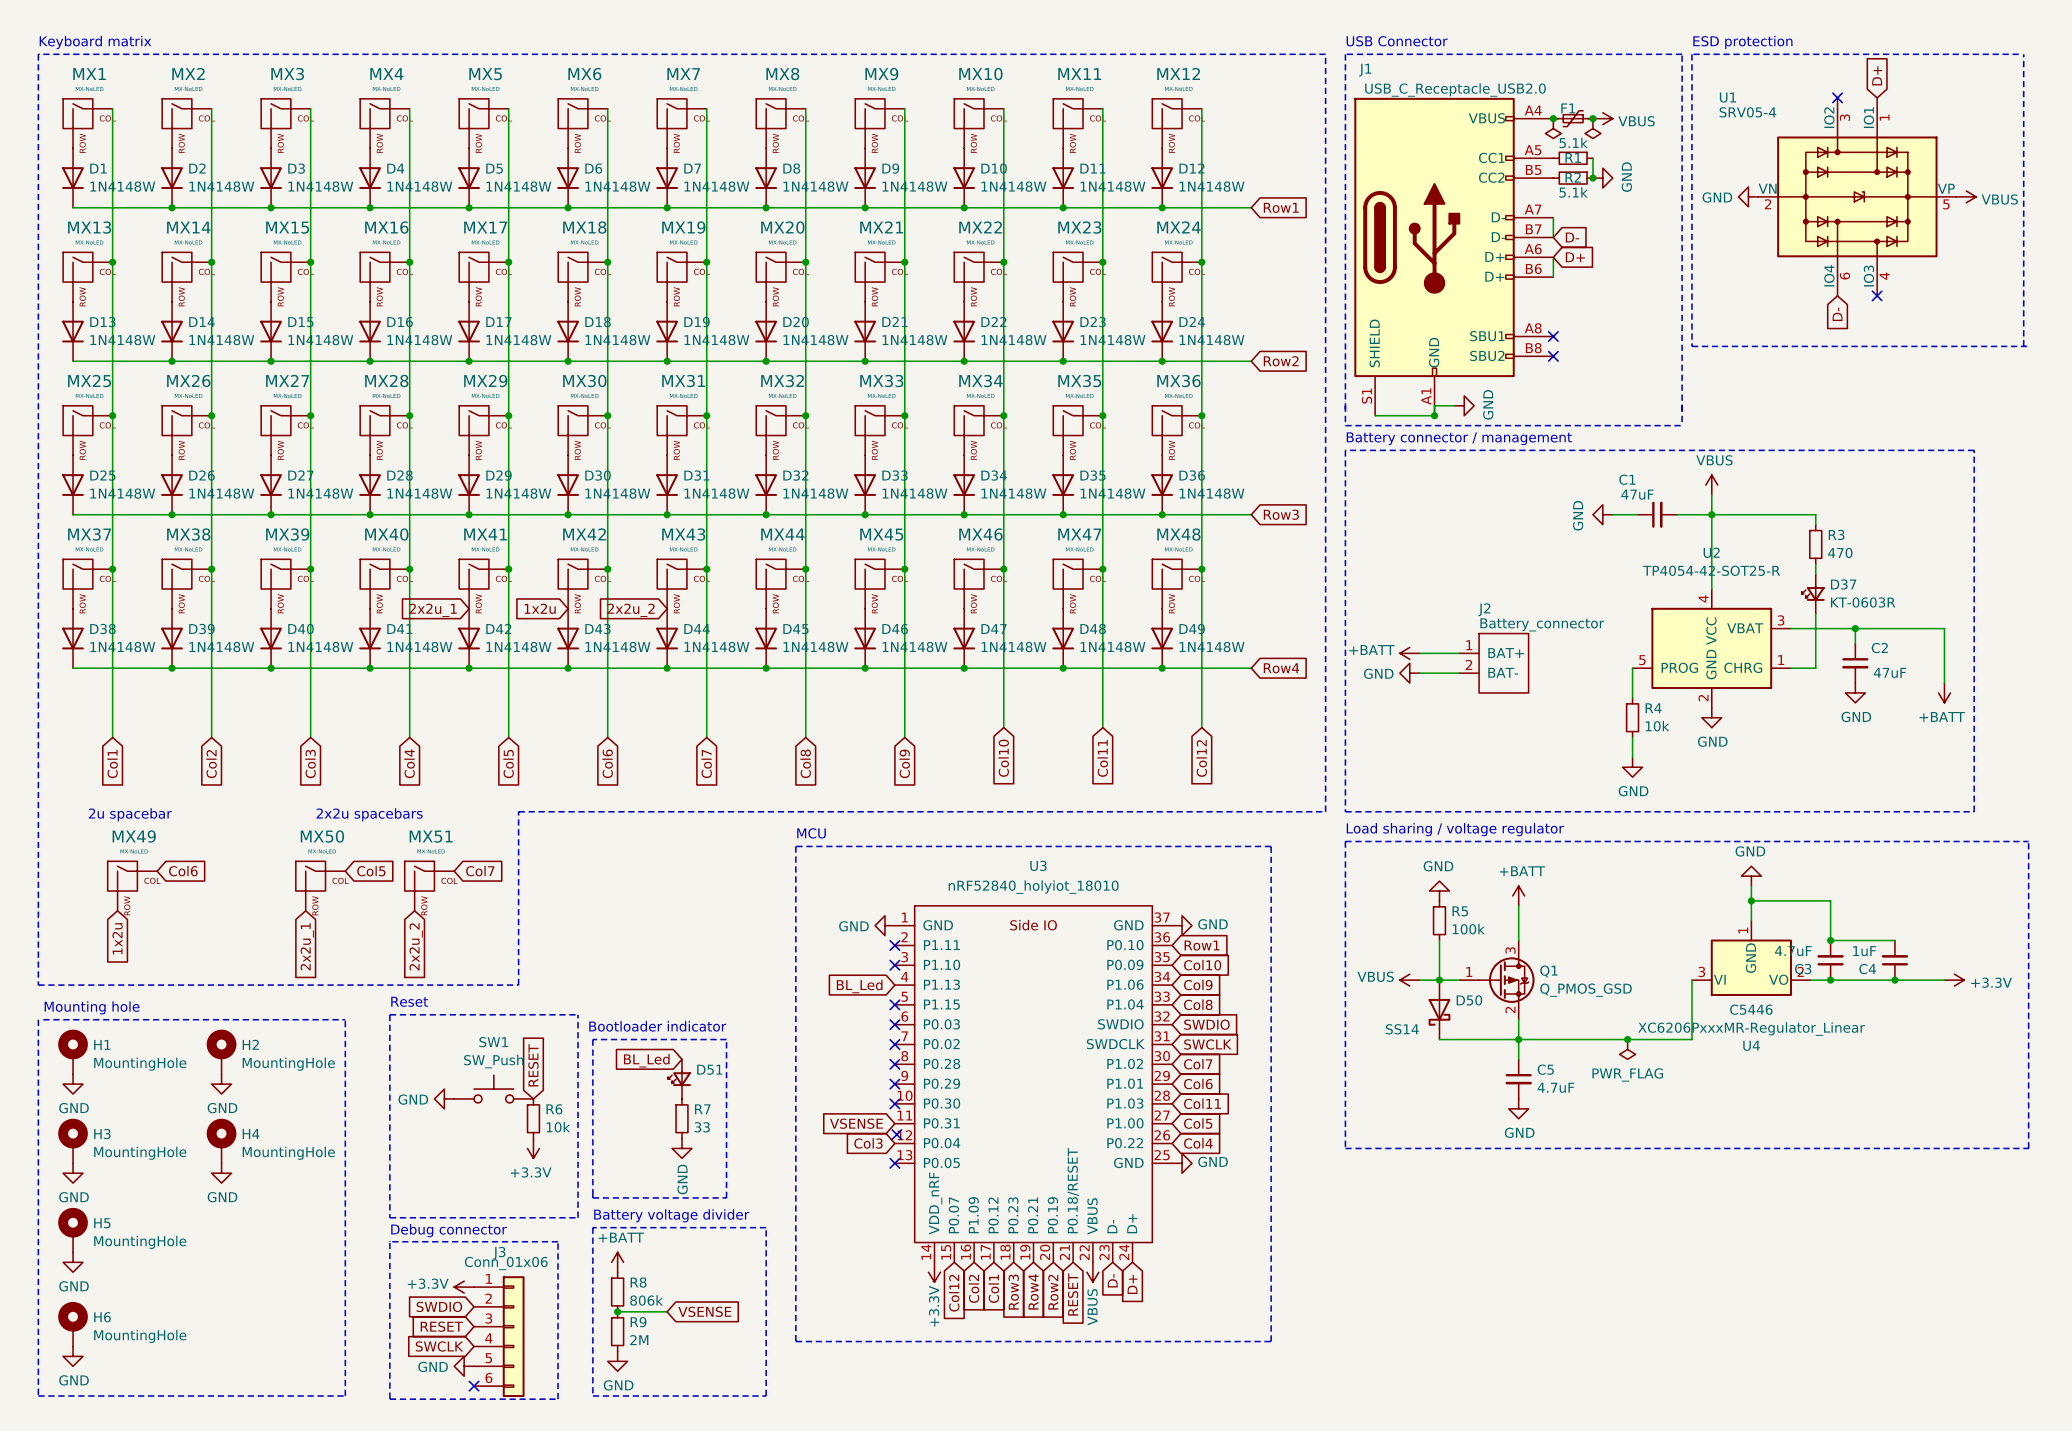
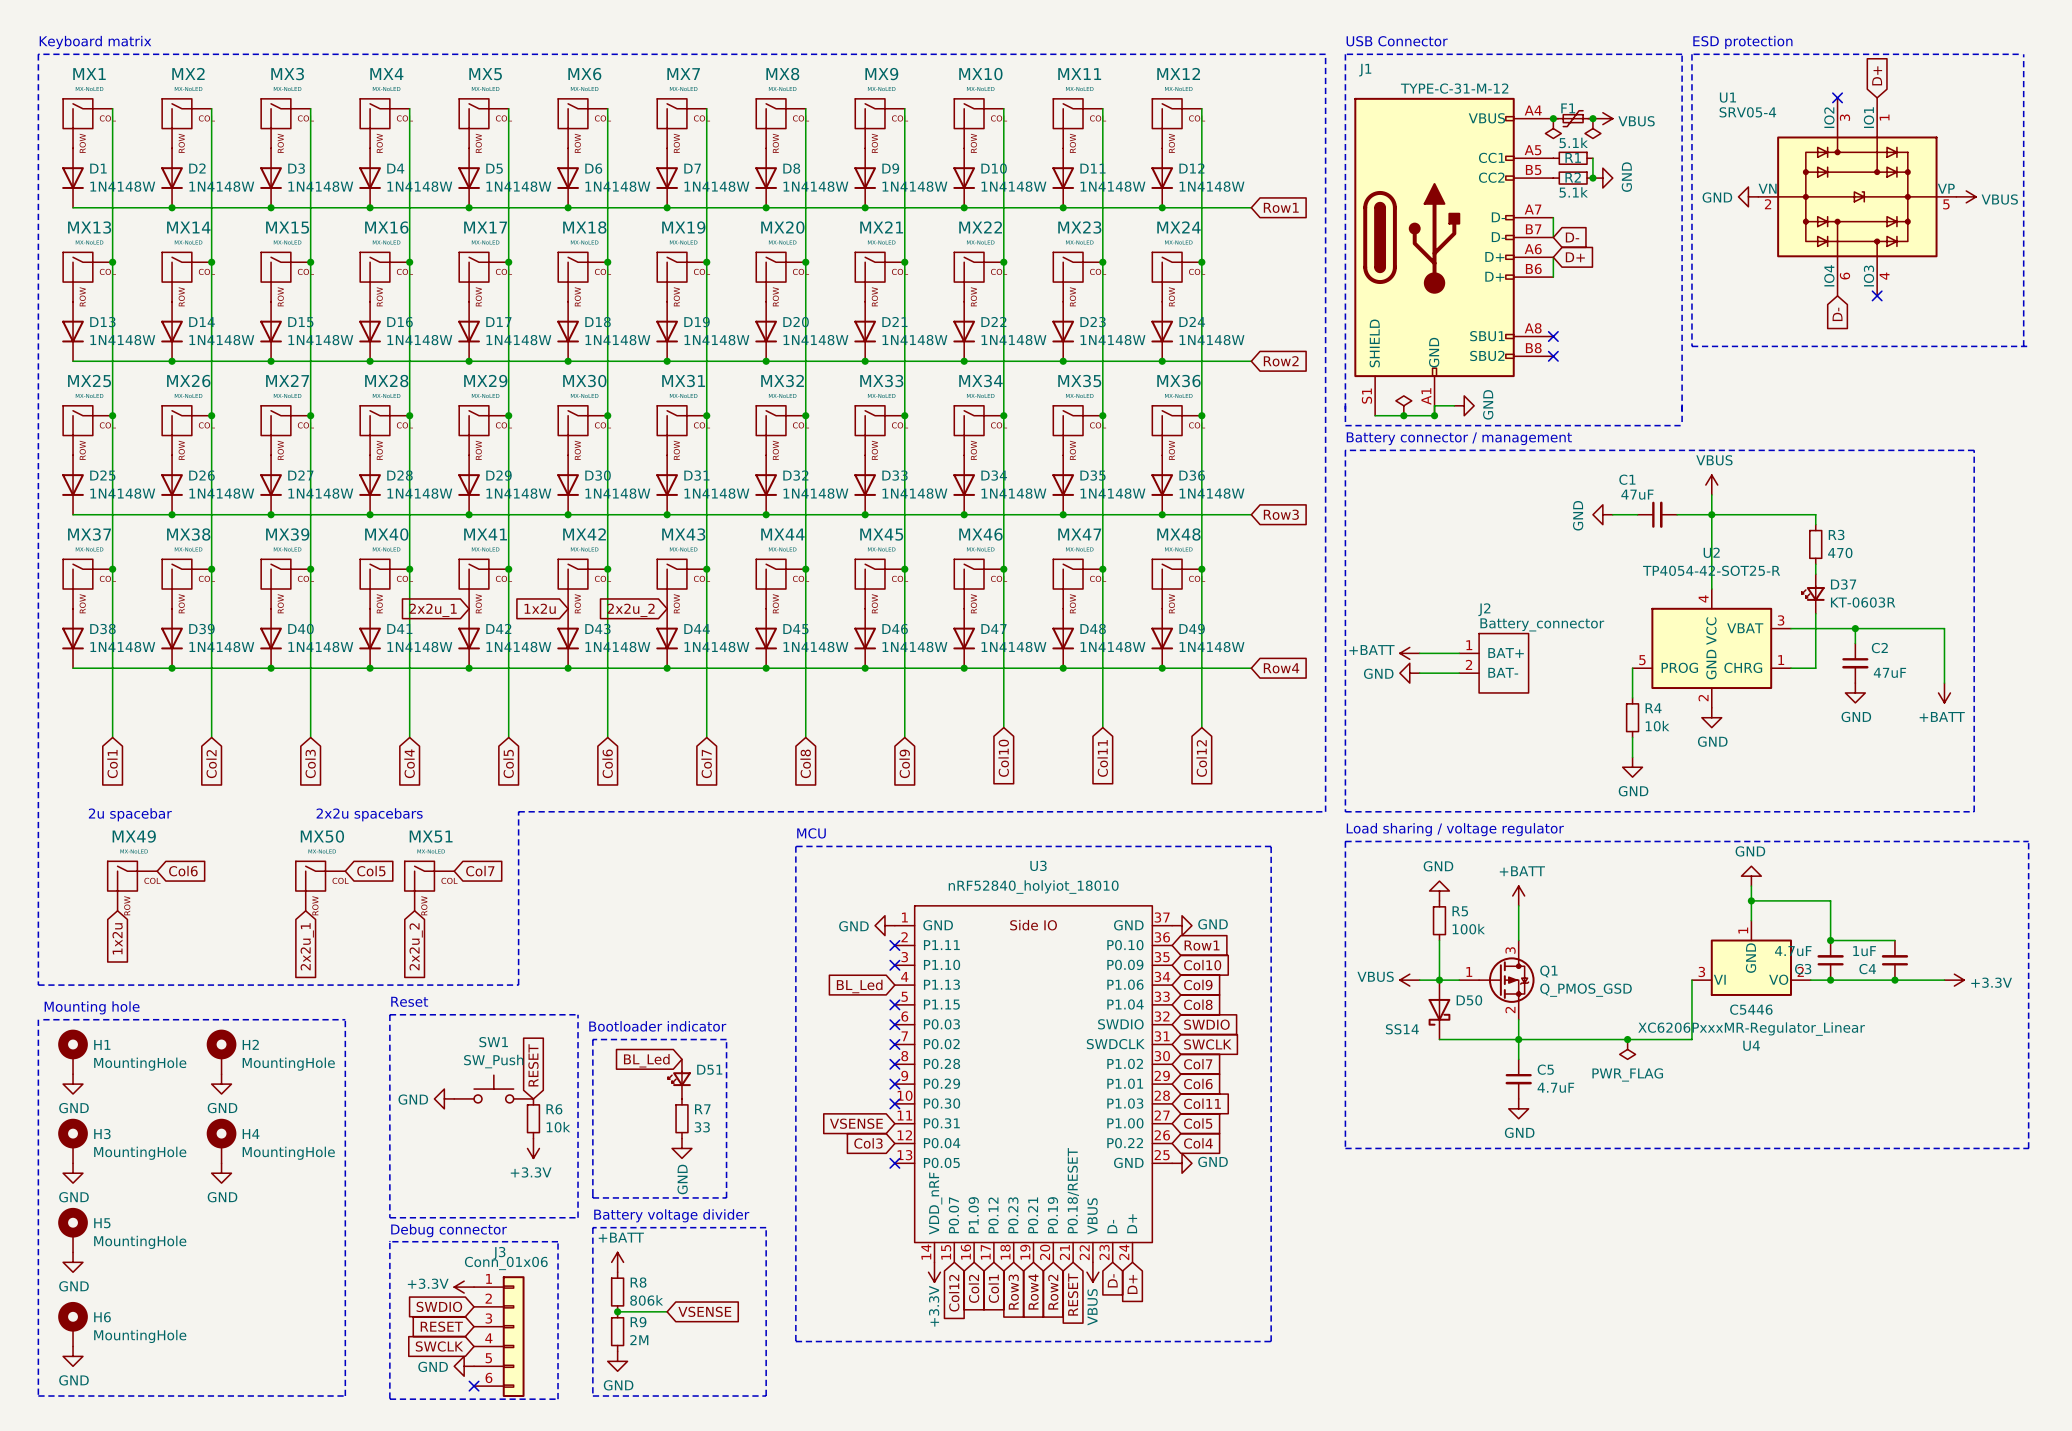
J1 value: USB_C_Receptacle_USB2.0 (1455, 89) -> TYPE-C-31-M-12 (1454, 88)
power symbol: none -> (1403, 405)
junction: none -> (1403, 415)
no-connect mark: (896, 1134) -> none

